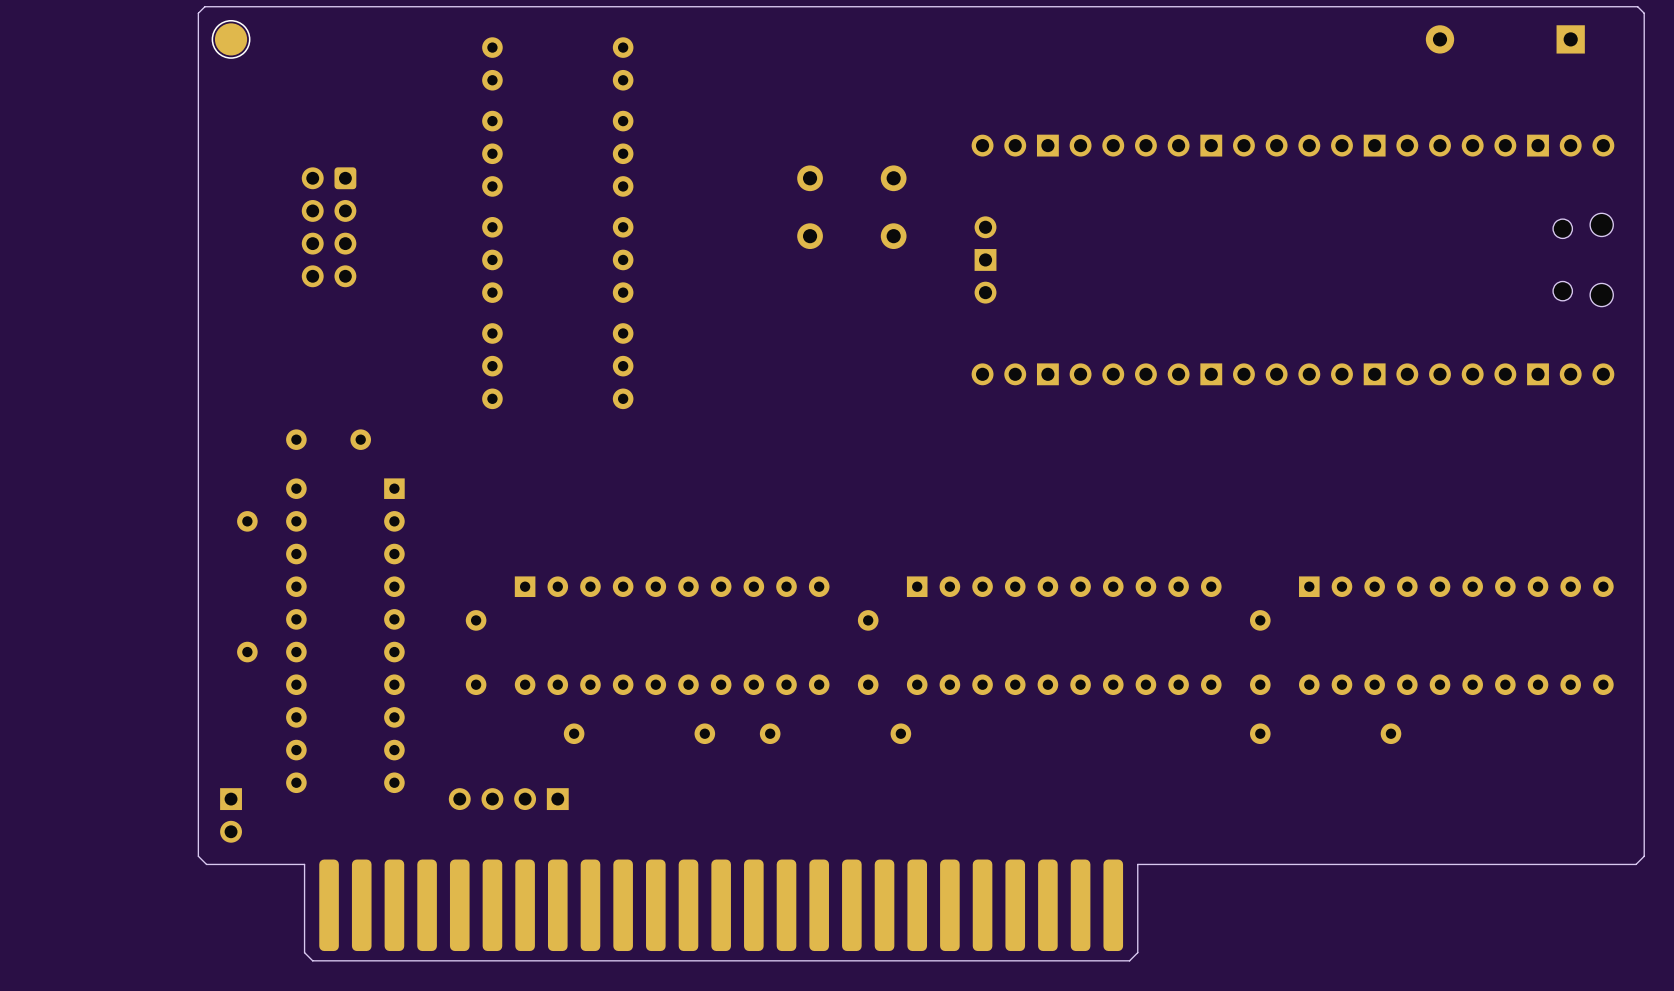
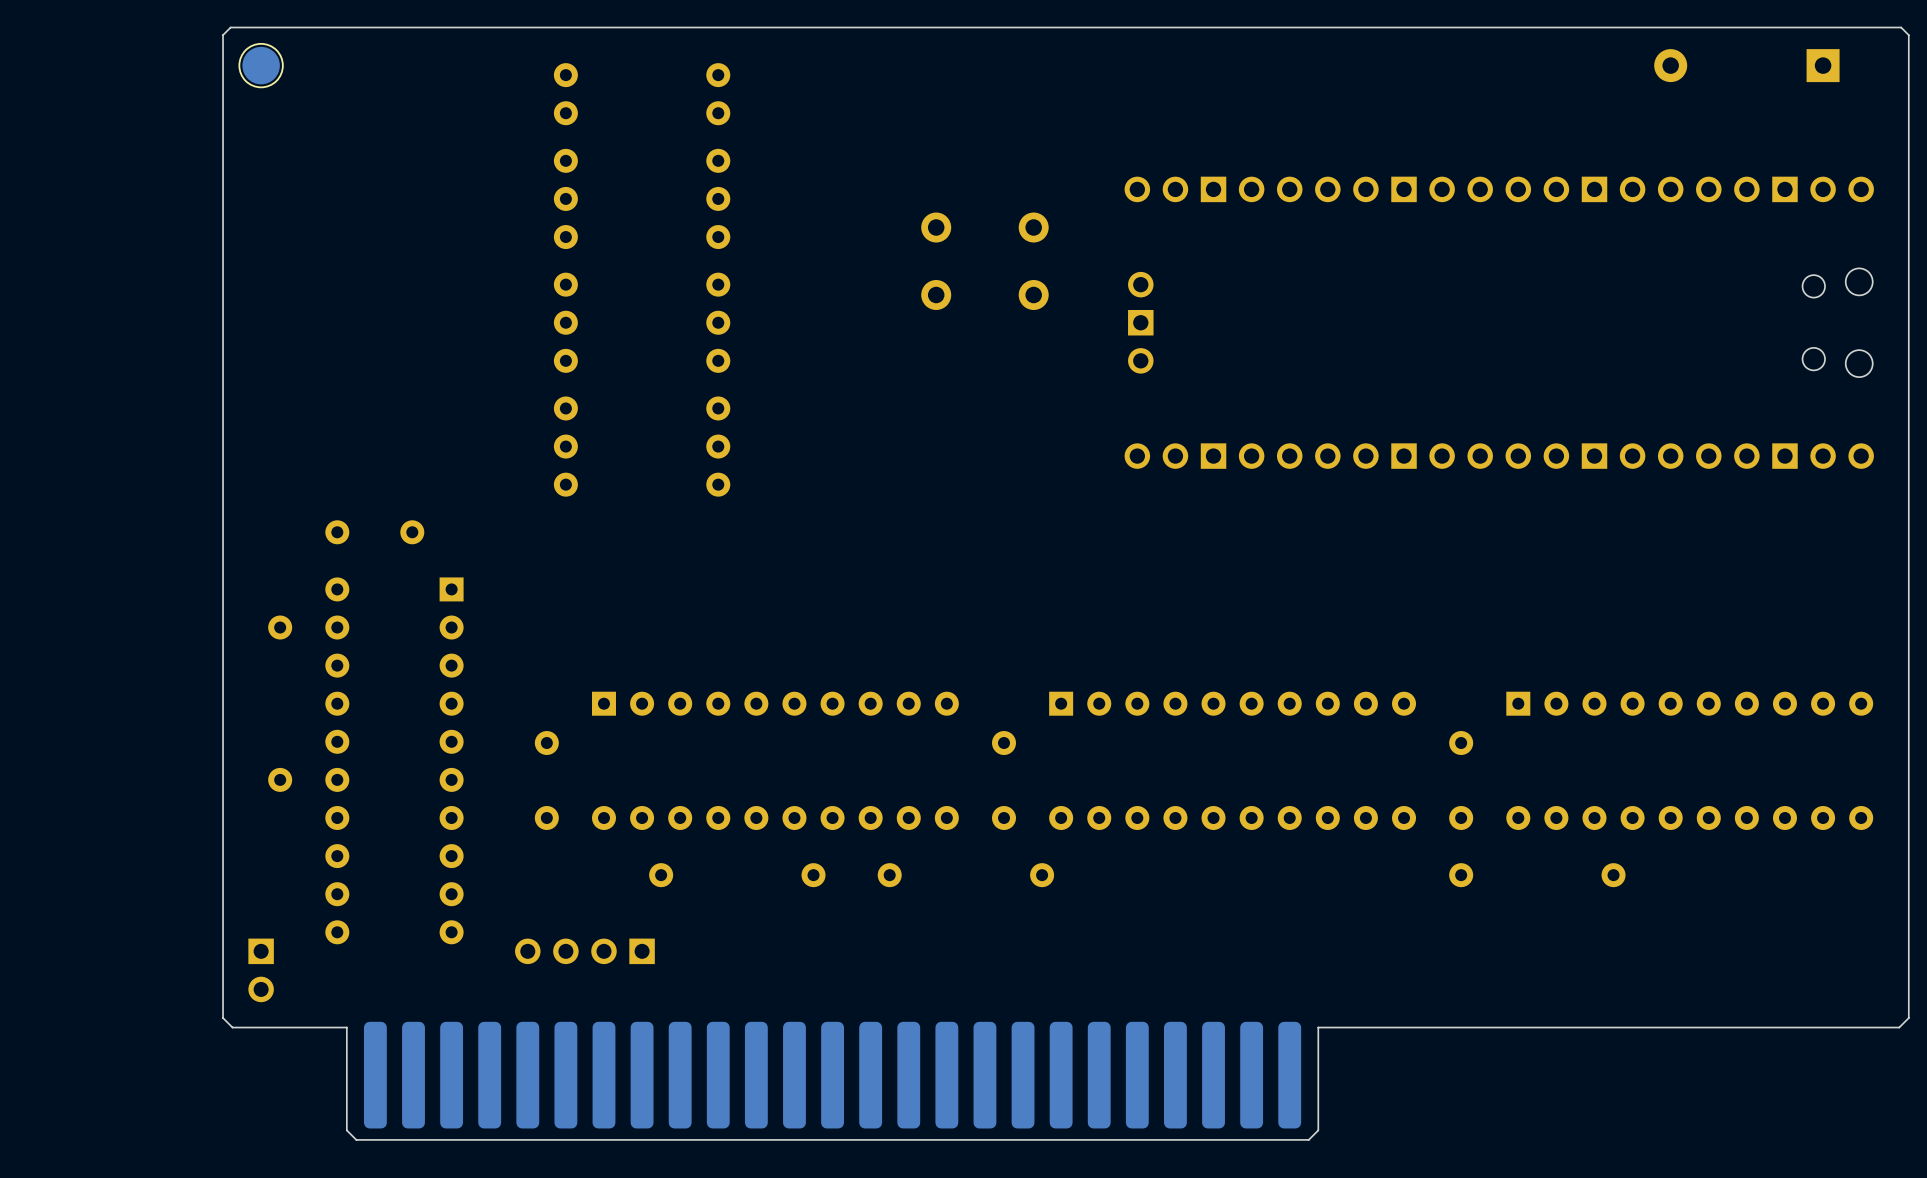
part: (329, 227) -> none

